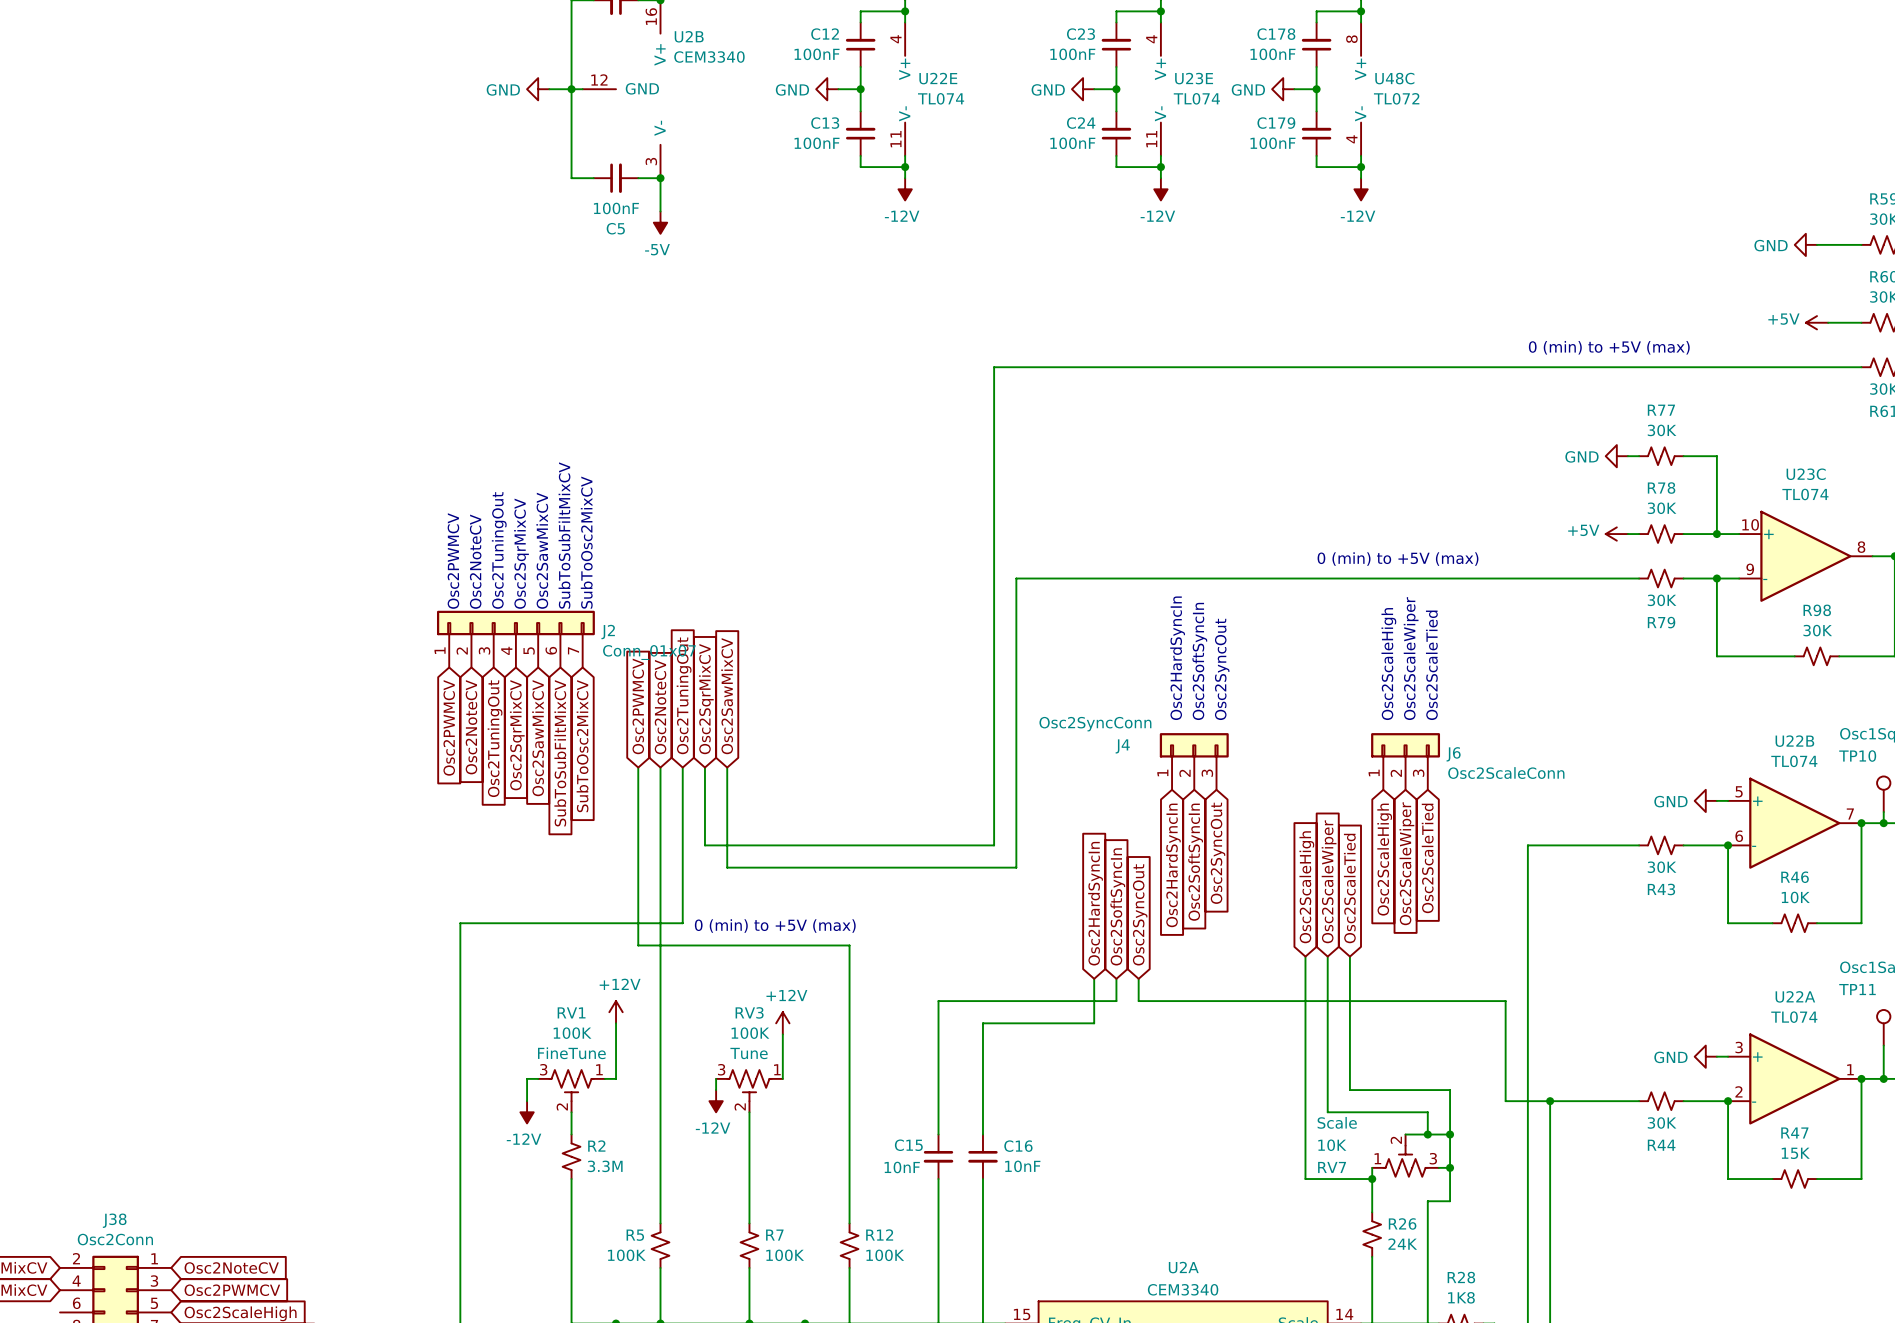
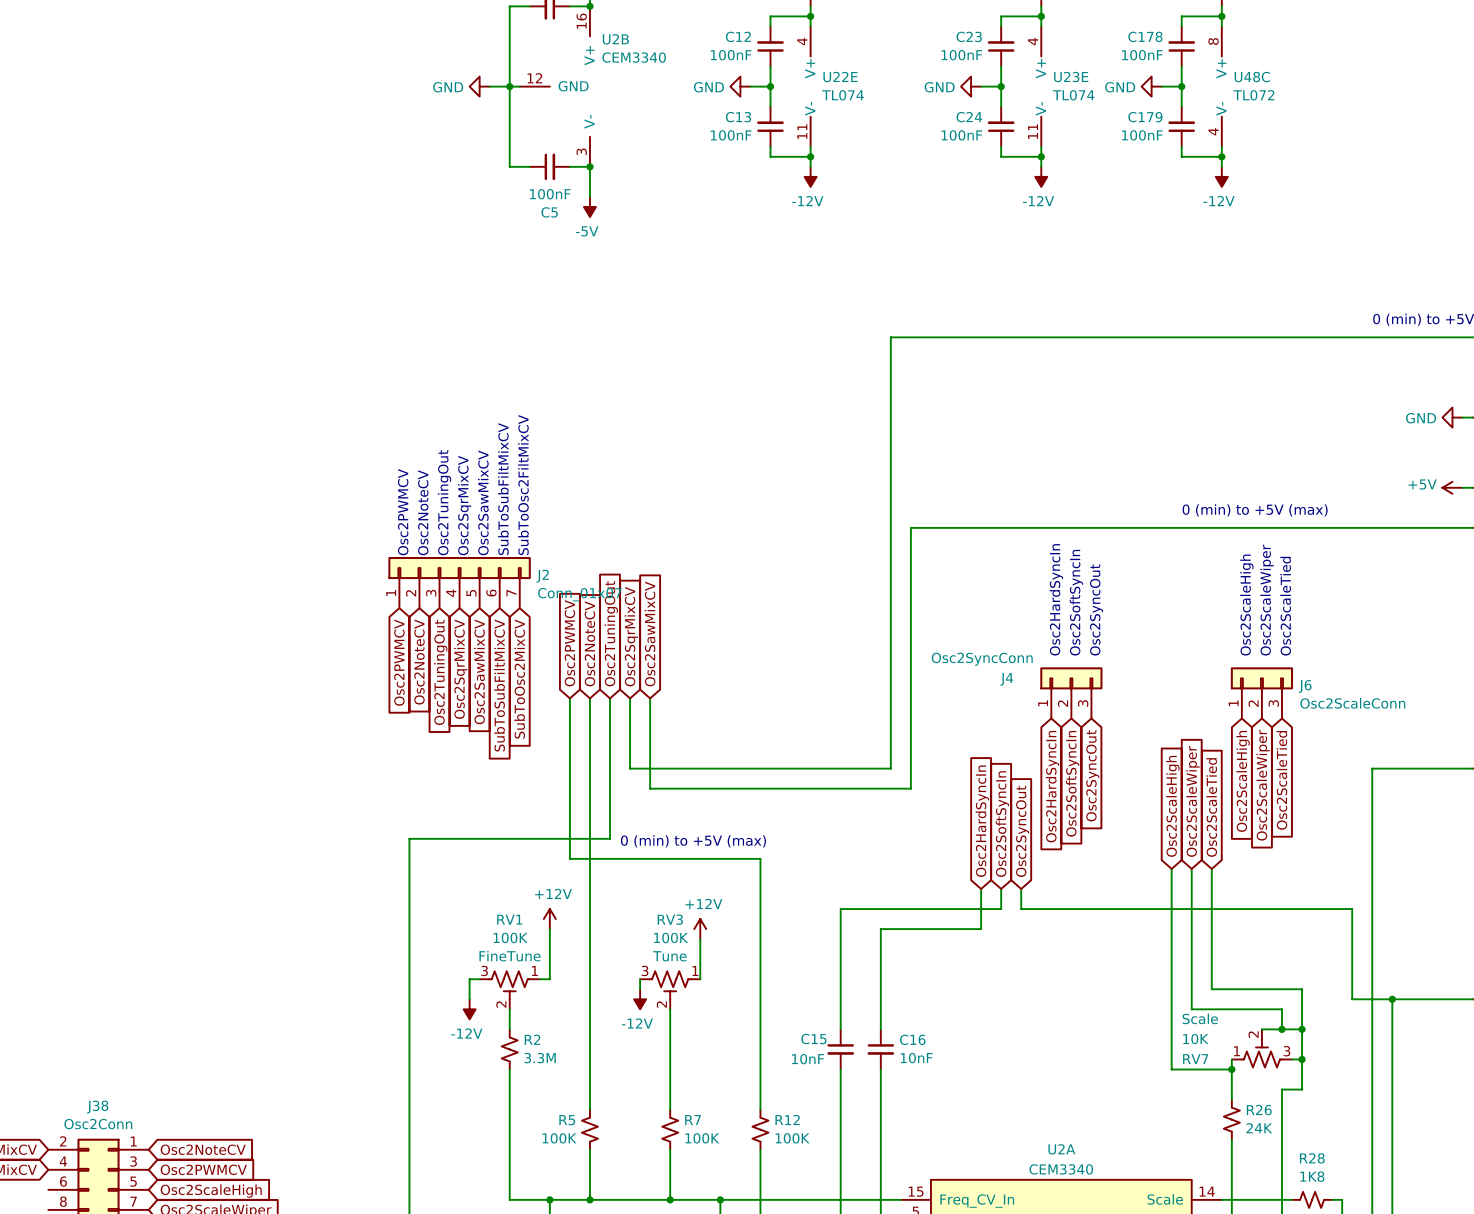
text: SubToOsc2MixCV (586, 542) -> SubToOsc2FiltMixCV (523, 485)

